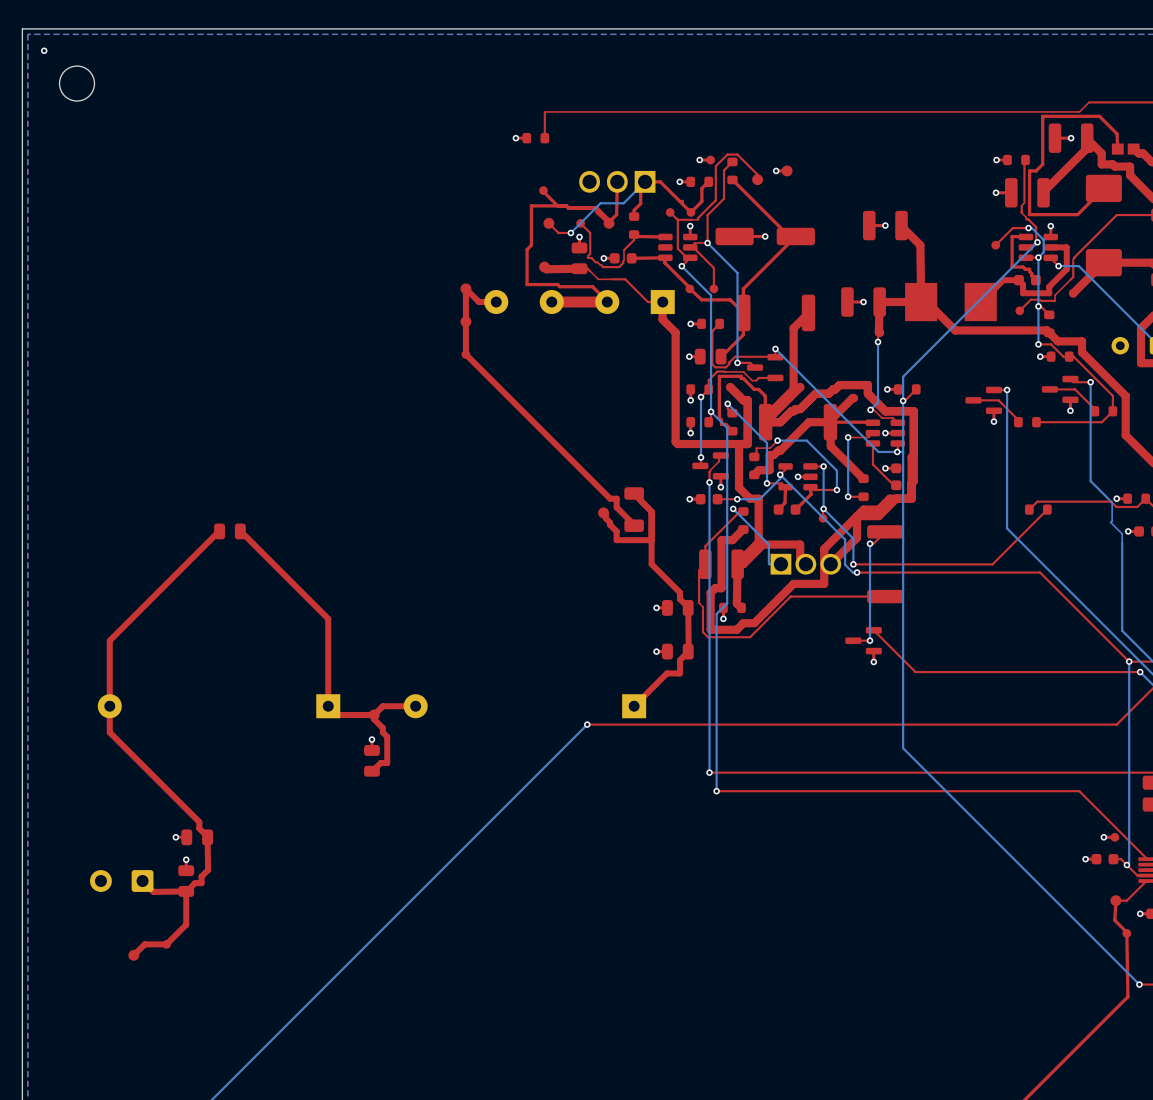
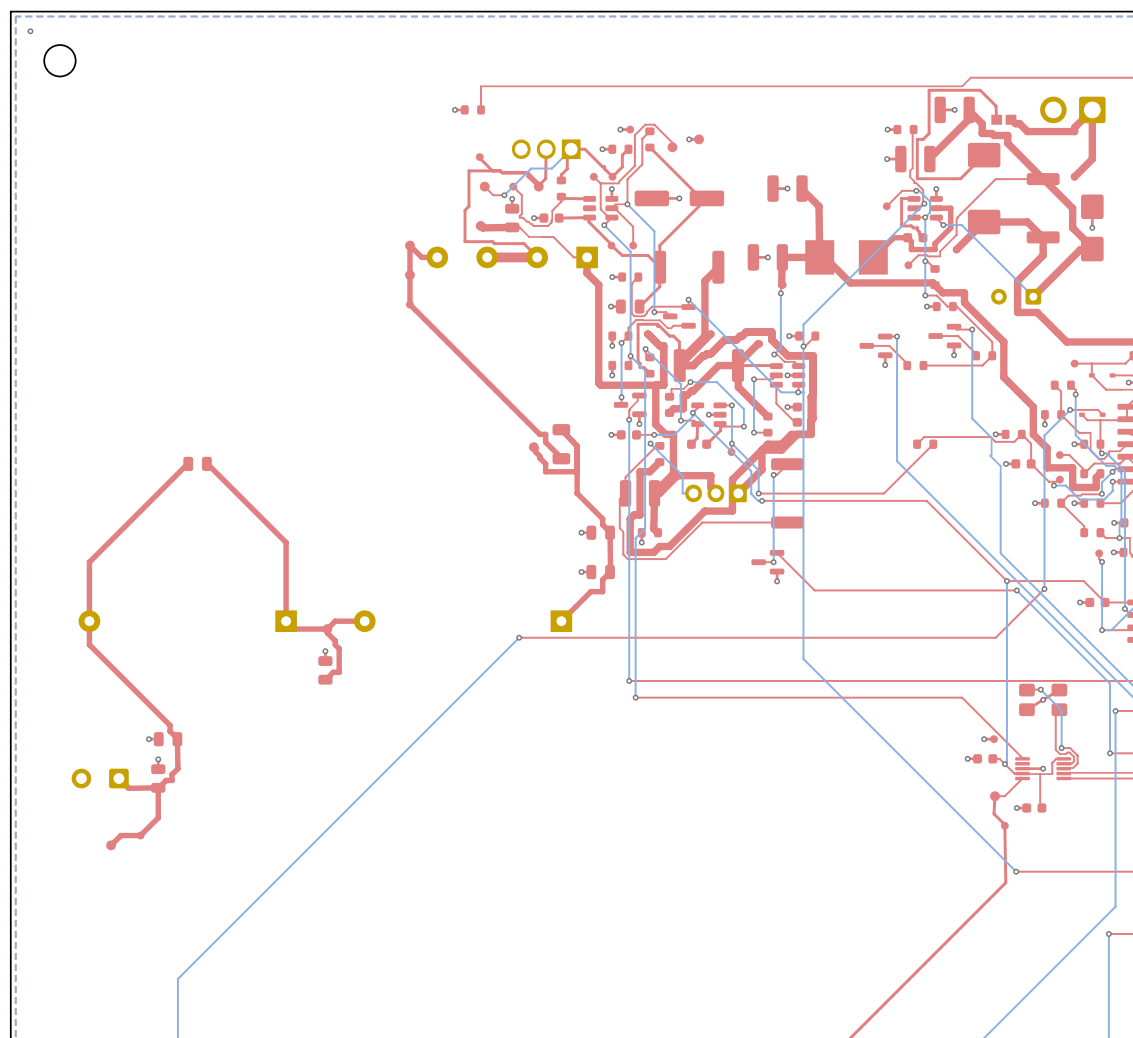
part footprint: [770, 553, 842, 575] -> [685, 484, 747, 503]

